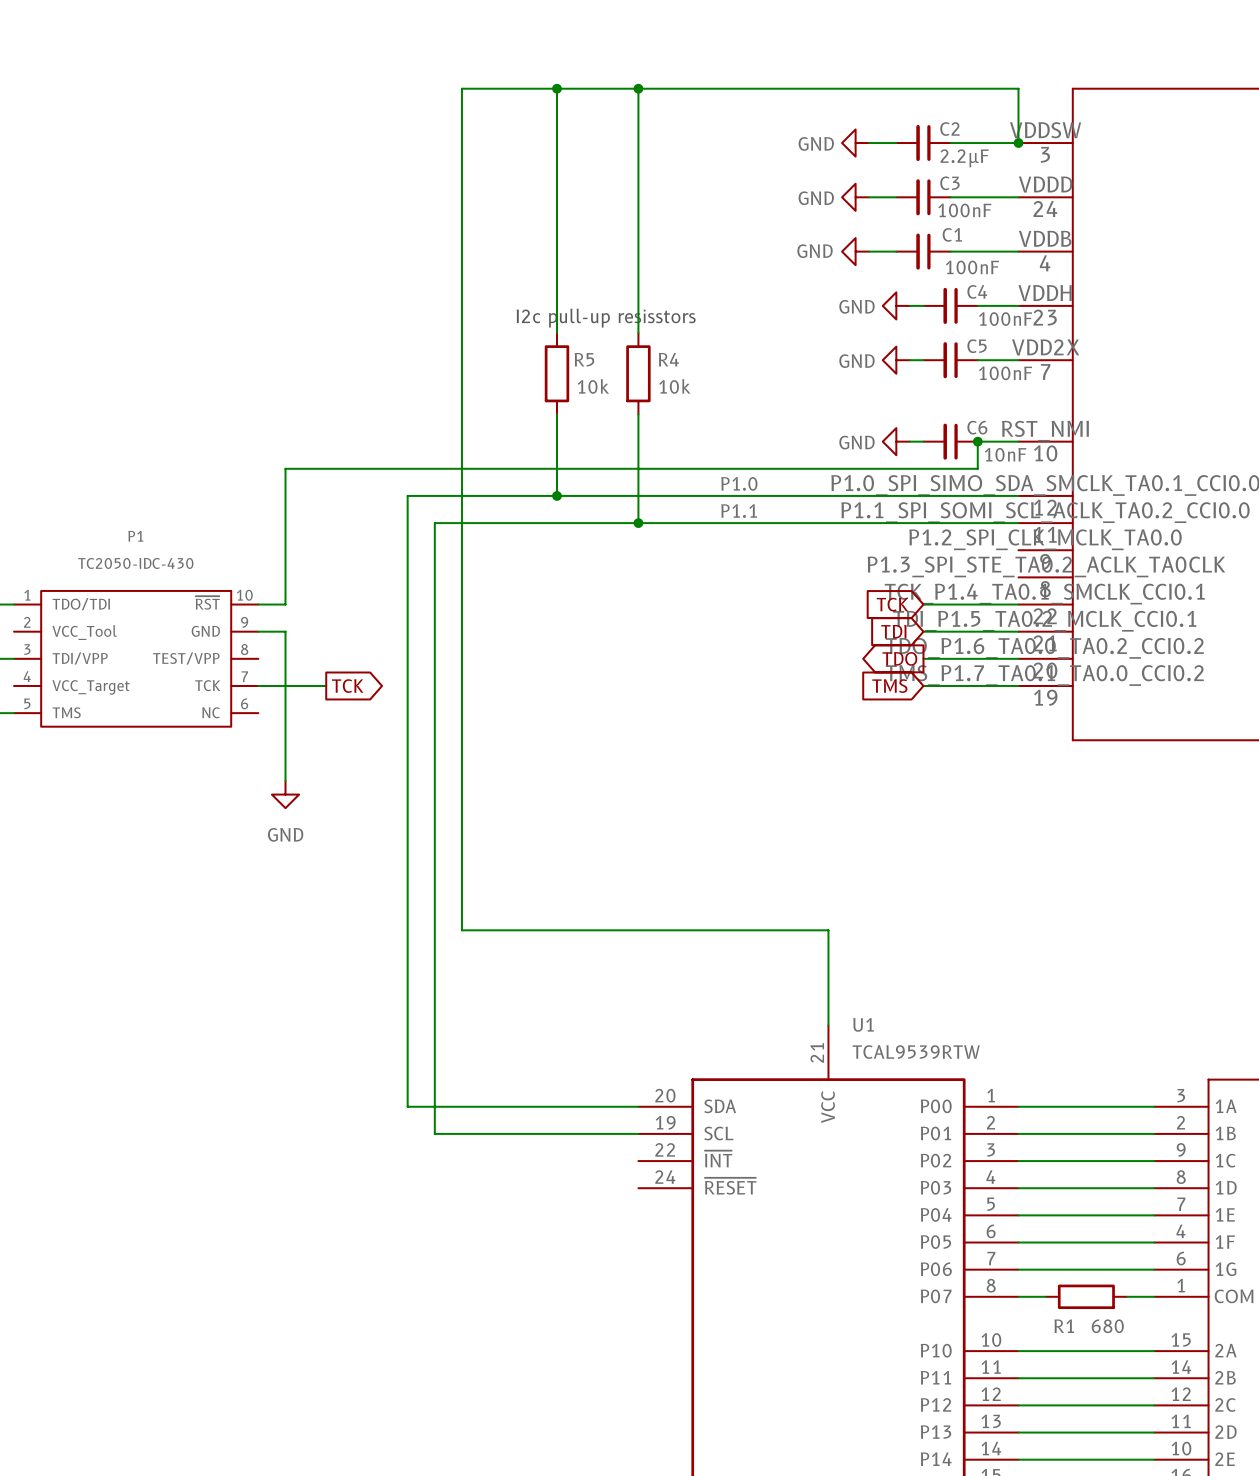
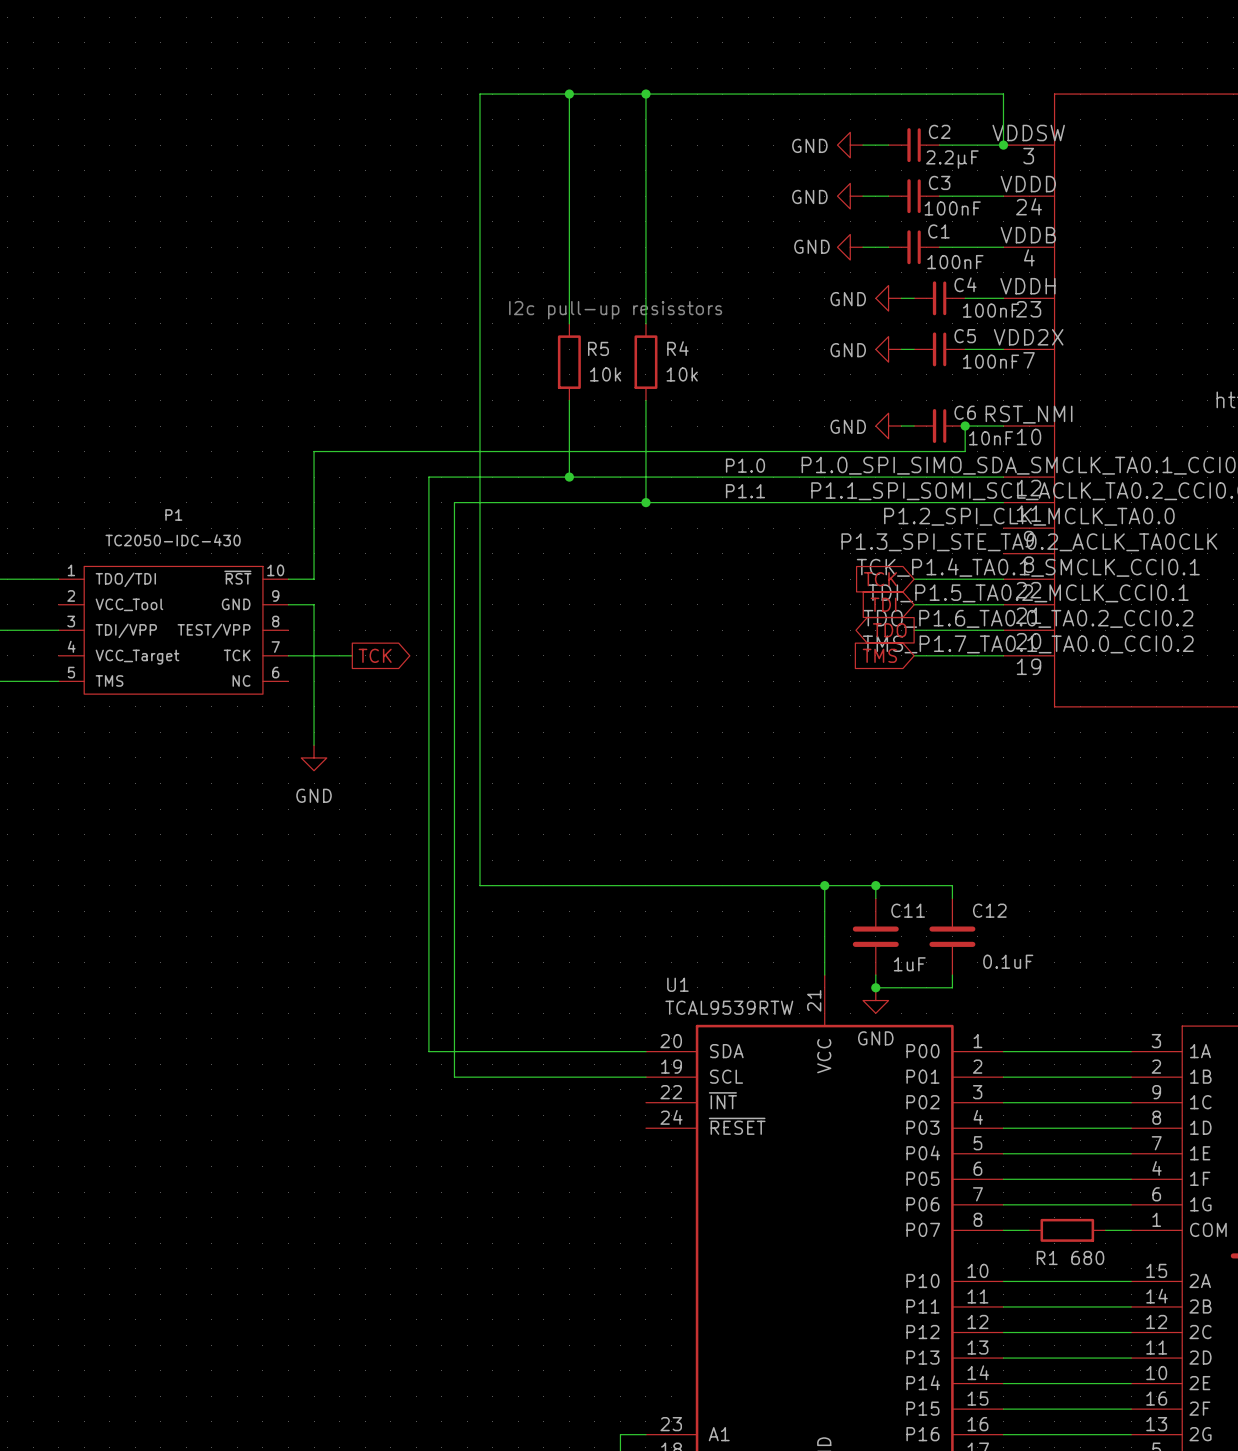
wire: none -> (824, 885) (952, 885) (952, 898)
junction: none -> (824, 885)
wire: none -> (875, 885) (875, 898)
junction: none -> (875, 885)
C11: none -> 1uF (875, 936)
C12: none -> 0.1uF (952, 936)
U1 name position: U1 (863, 1024) -> U1 (677, 984)
wire: none -> (875, 975) (875, 987) (952, 987) (952, 975)
junction: none -> (875, 987)
power symbol: none -> GND (875, 1000)
U1 value position: TCAL9539RTW (916, 1052) -> TCAL9539RTW (729, 1007)

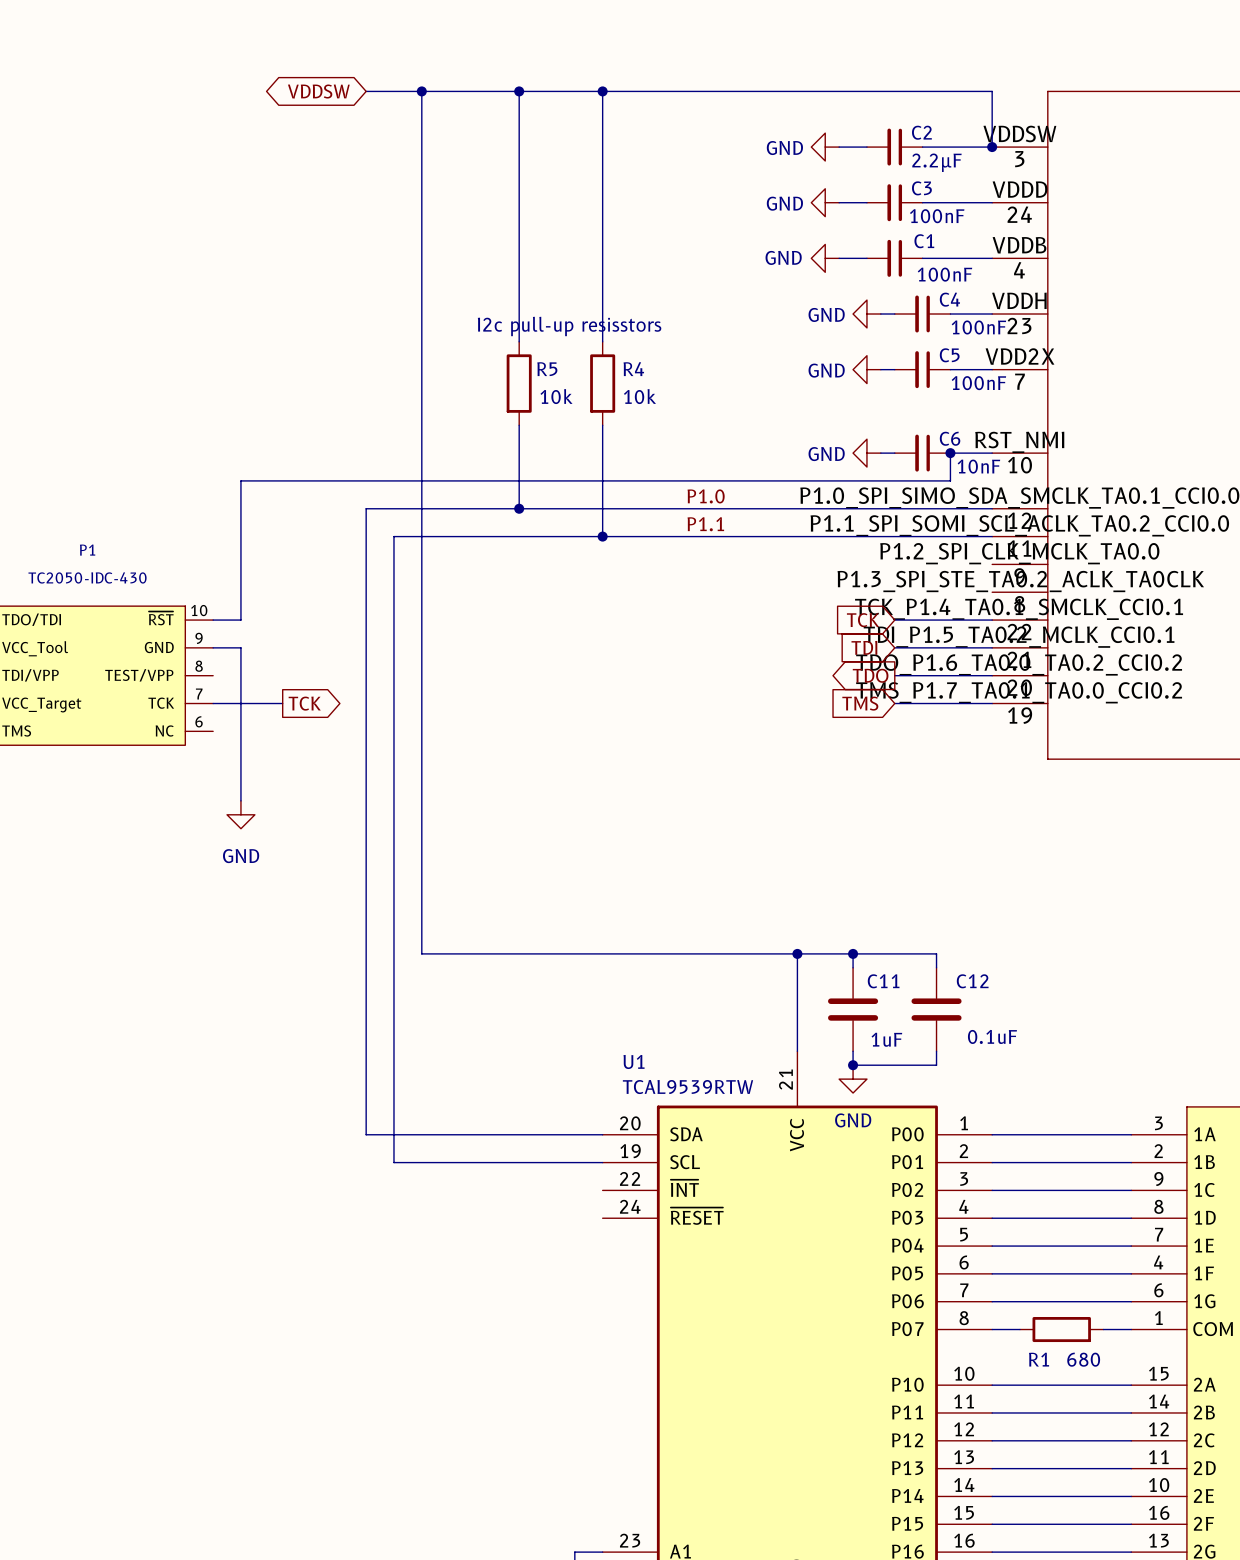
global label: none -> VDDSW (318, 91)
wire: none -> (366, 91) (421, 91)
junction: none -> (421, 91)

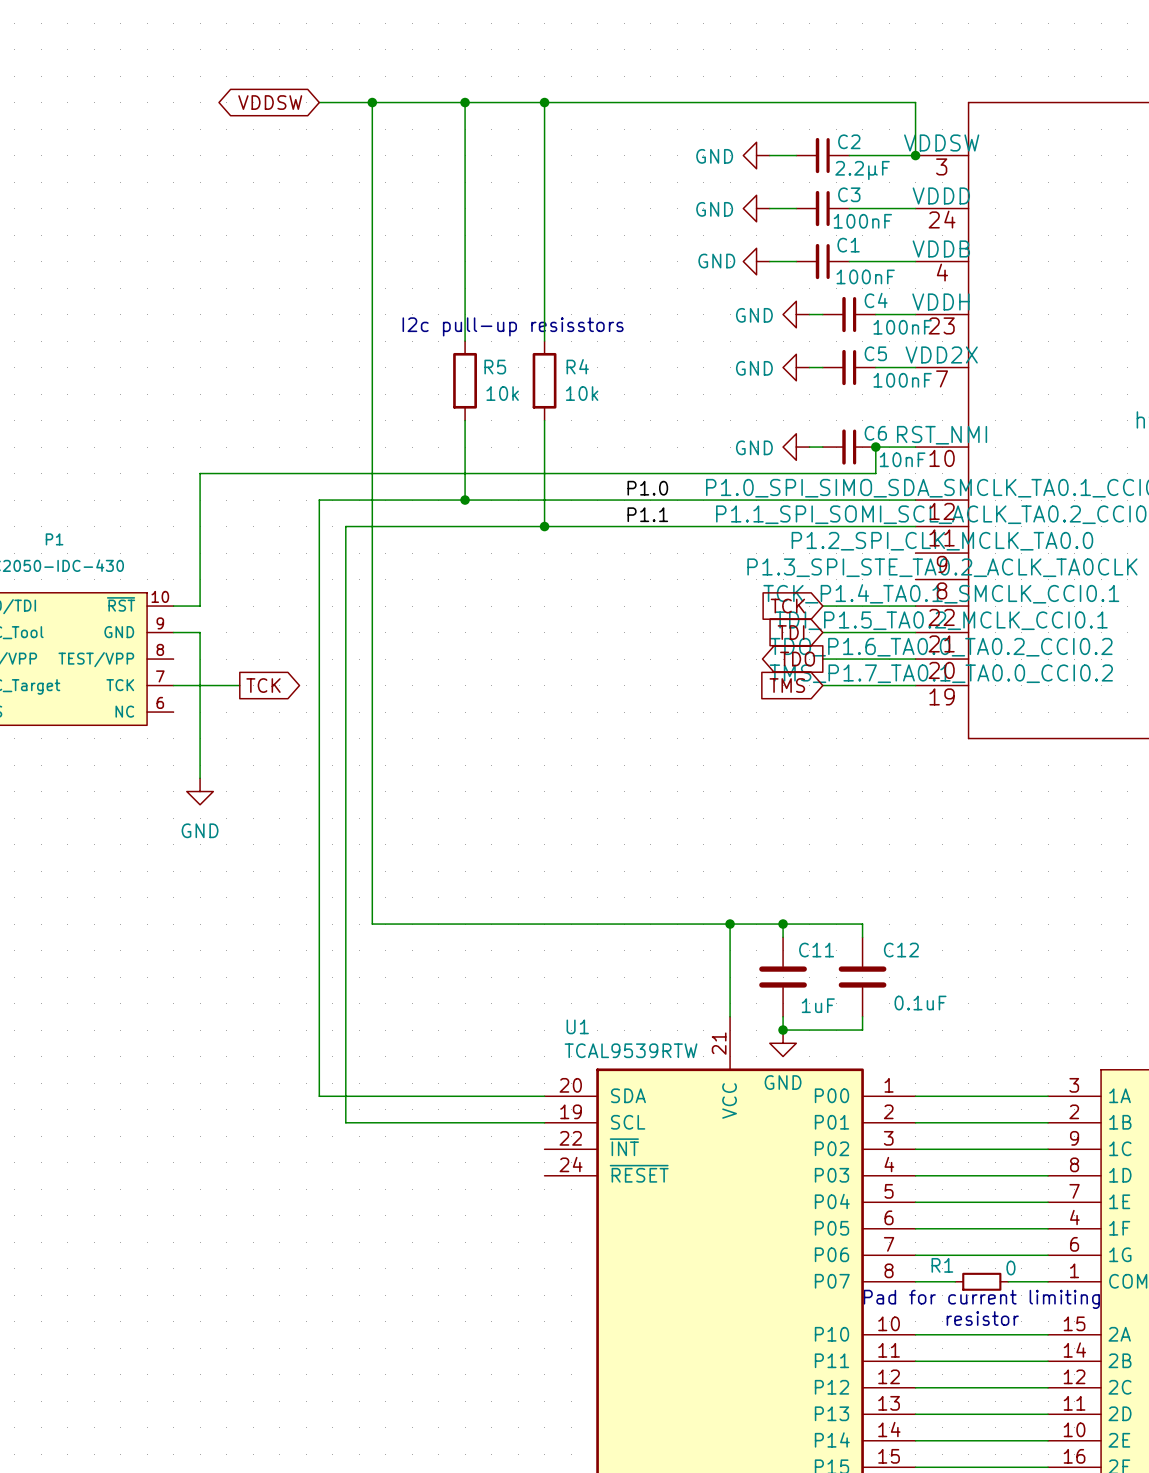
R1 symbol: [1019, 1317, 1104, 1343] -> [955, 1272, 1009, 1291]
text: none -> Pad for current limiting (981, 1299)
R1 name position: R1 (1039, 1359) -> R1 (942, 1265)
R1 value: 680 (1083, 1359) -> 0 (1010, 1268)
text: none -> resistor (982, 1318)

